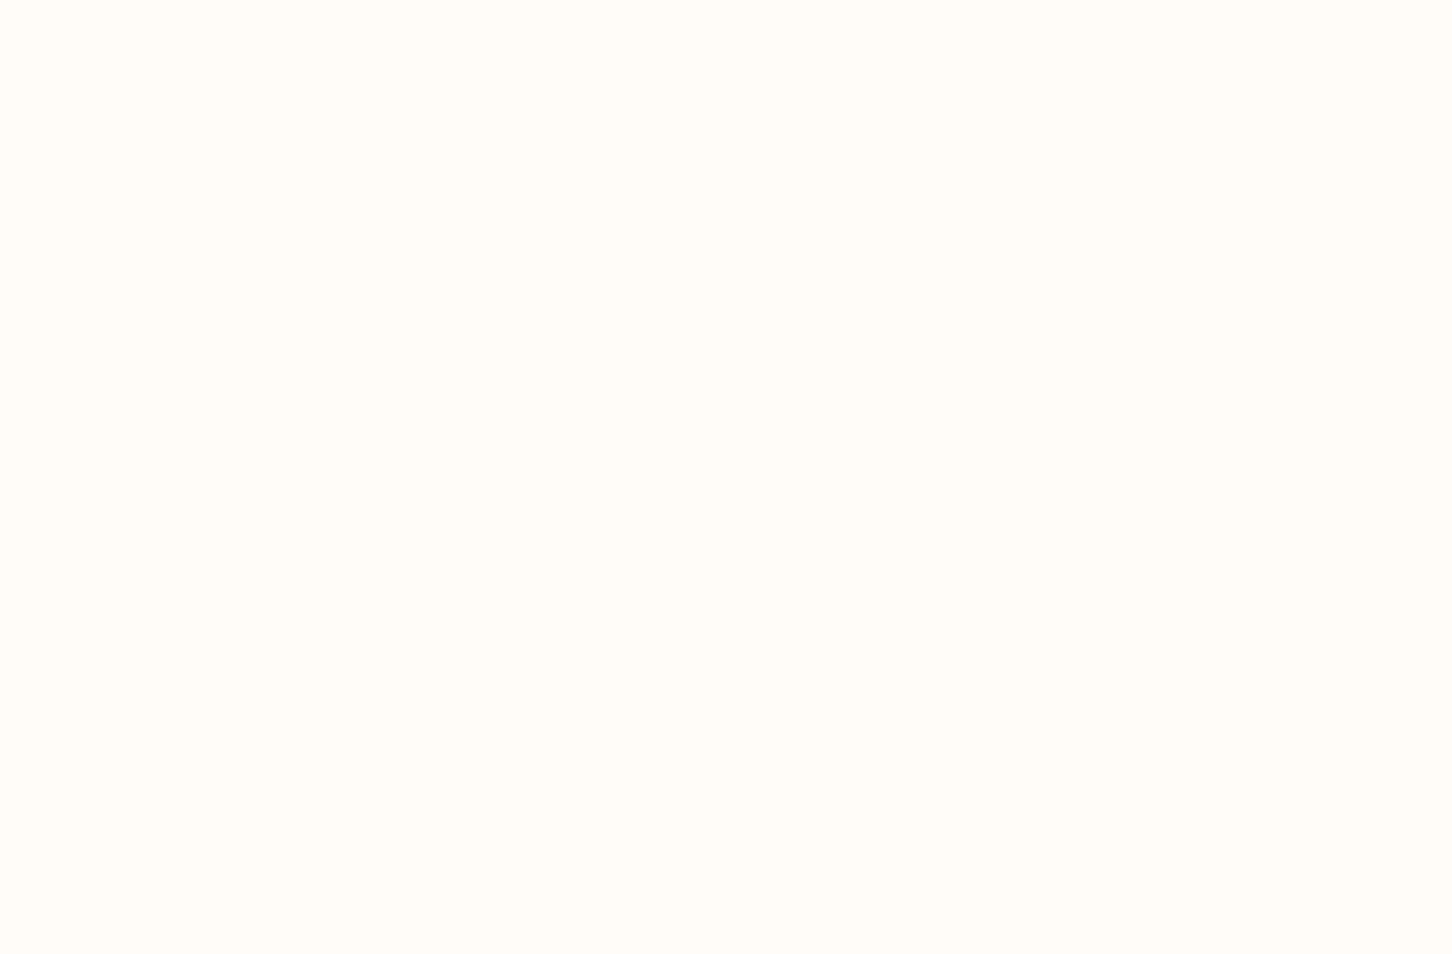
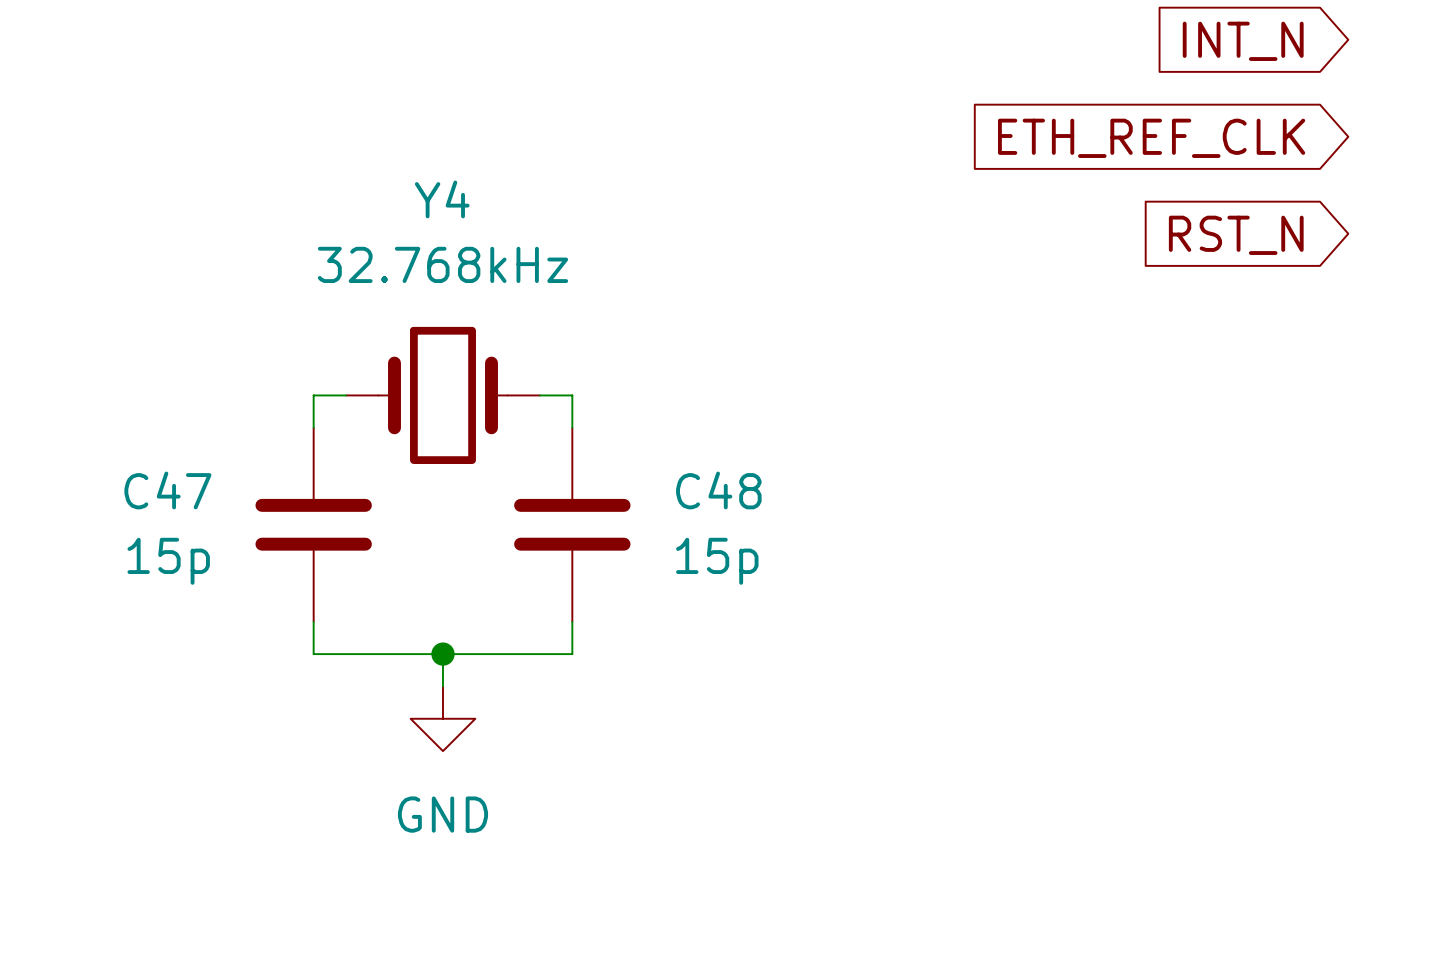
global label: none -> INT_N (1243, 41)
global label: none -> ETH_REF_CLK (1151, 138)
global label: none -> RST_N (1236, 235)
wire: none -> (345, 395) (313, 395) (313, 427)
Y4: none -> 32.768kHz (442, 395)
wire: none -> (539, 395) (572, 395) (572, 427)
C47: none -> 15p (313, 524)
C48: none -> 15p (572, 524)
wire: none -> (313, 621) (313, 654) (572, 654) (572, 621)
wire: none -> (442, 654) (442, 686)
junction: none -> (442, 654)
power symbol: none -> GND (442, 718)

